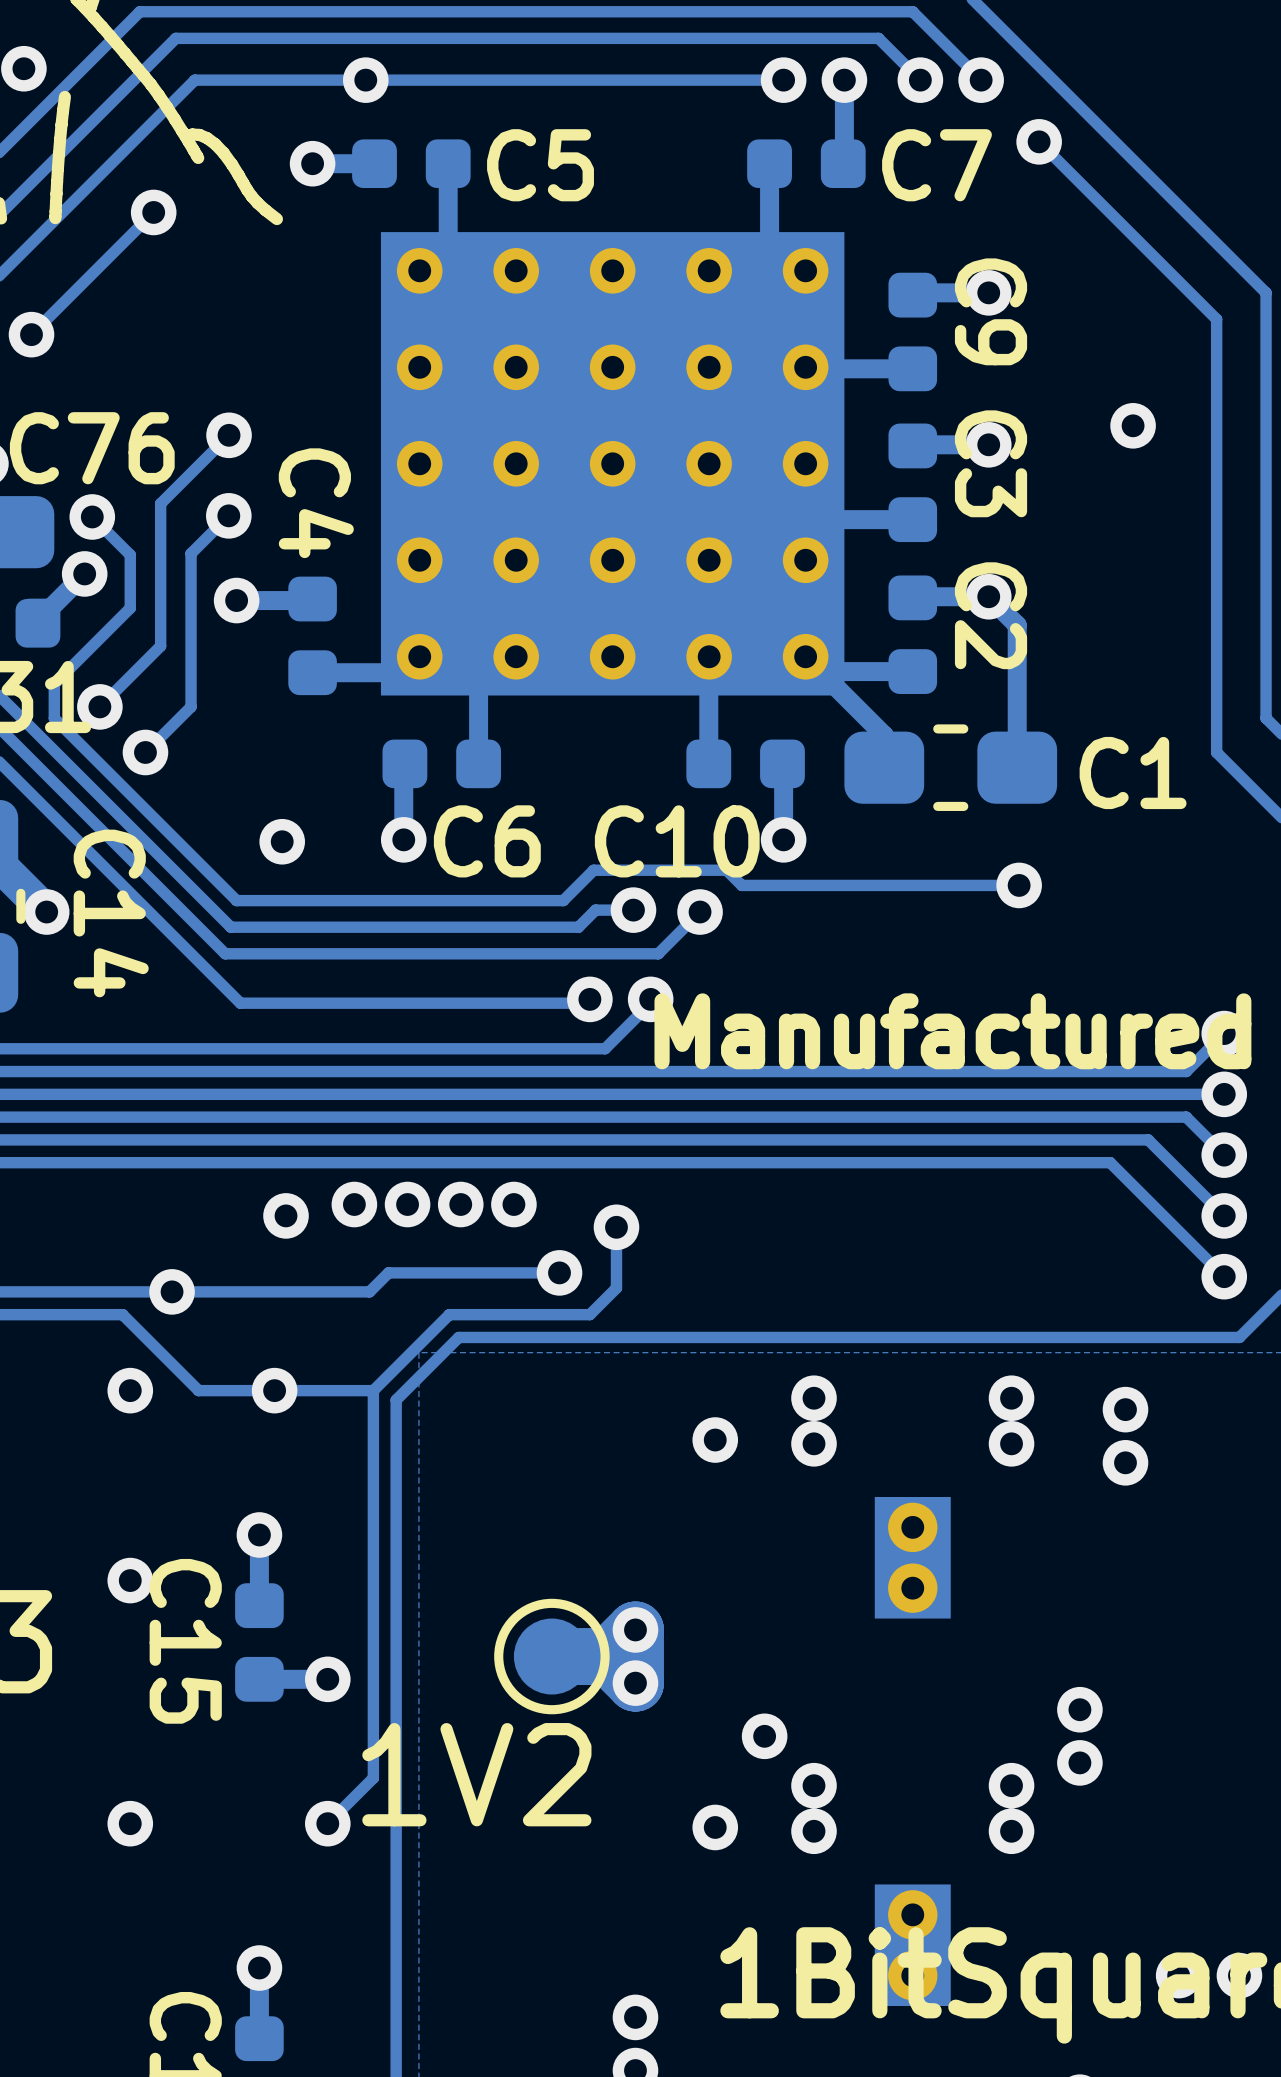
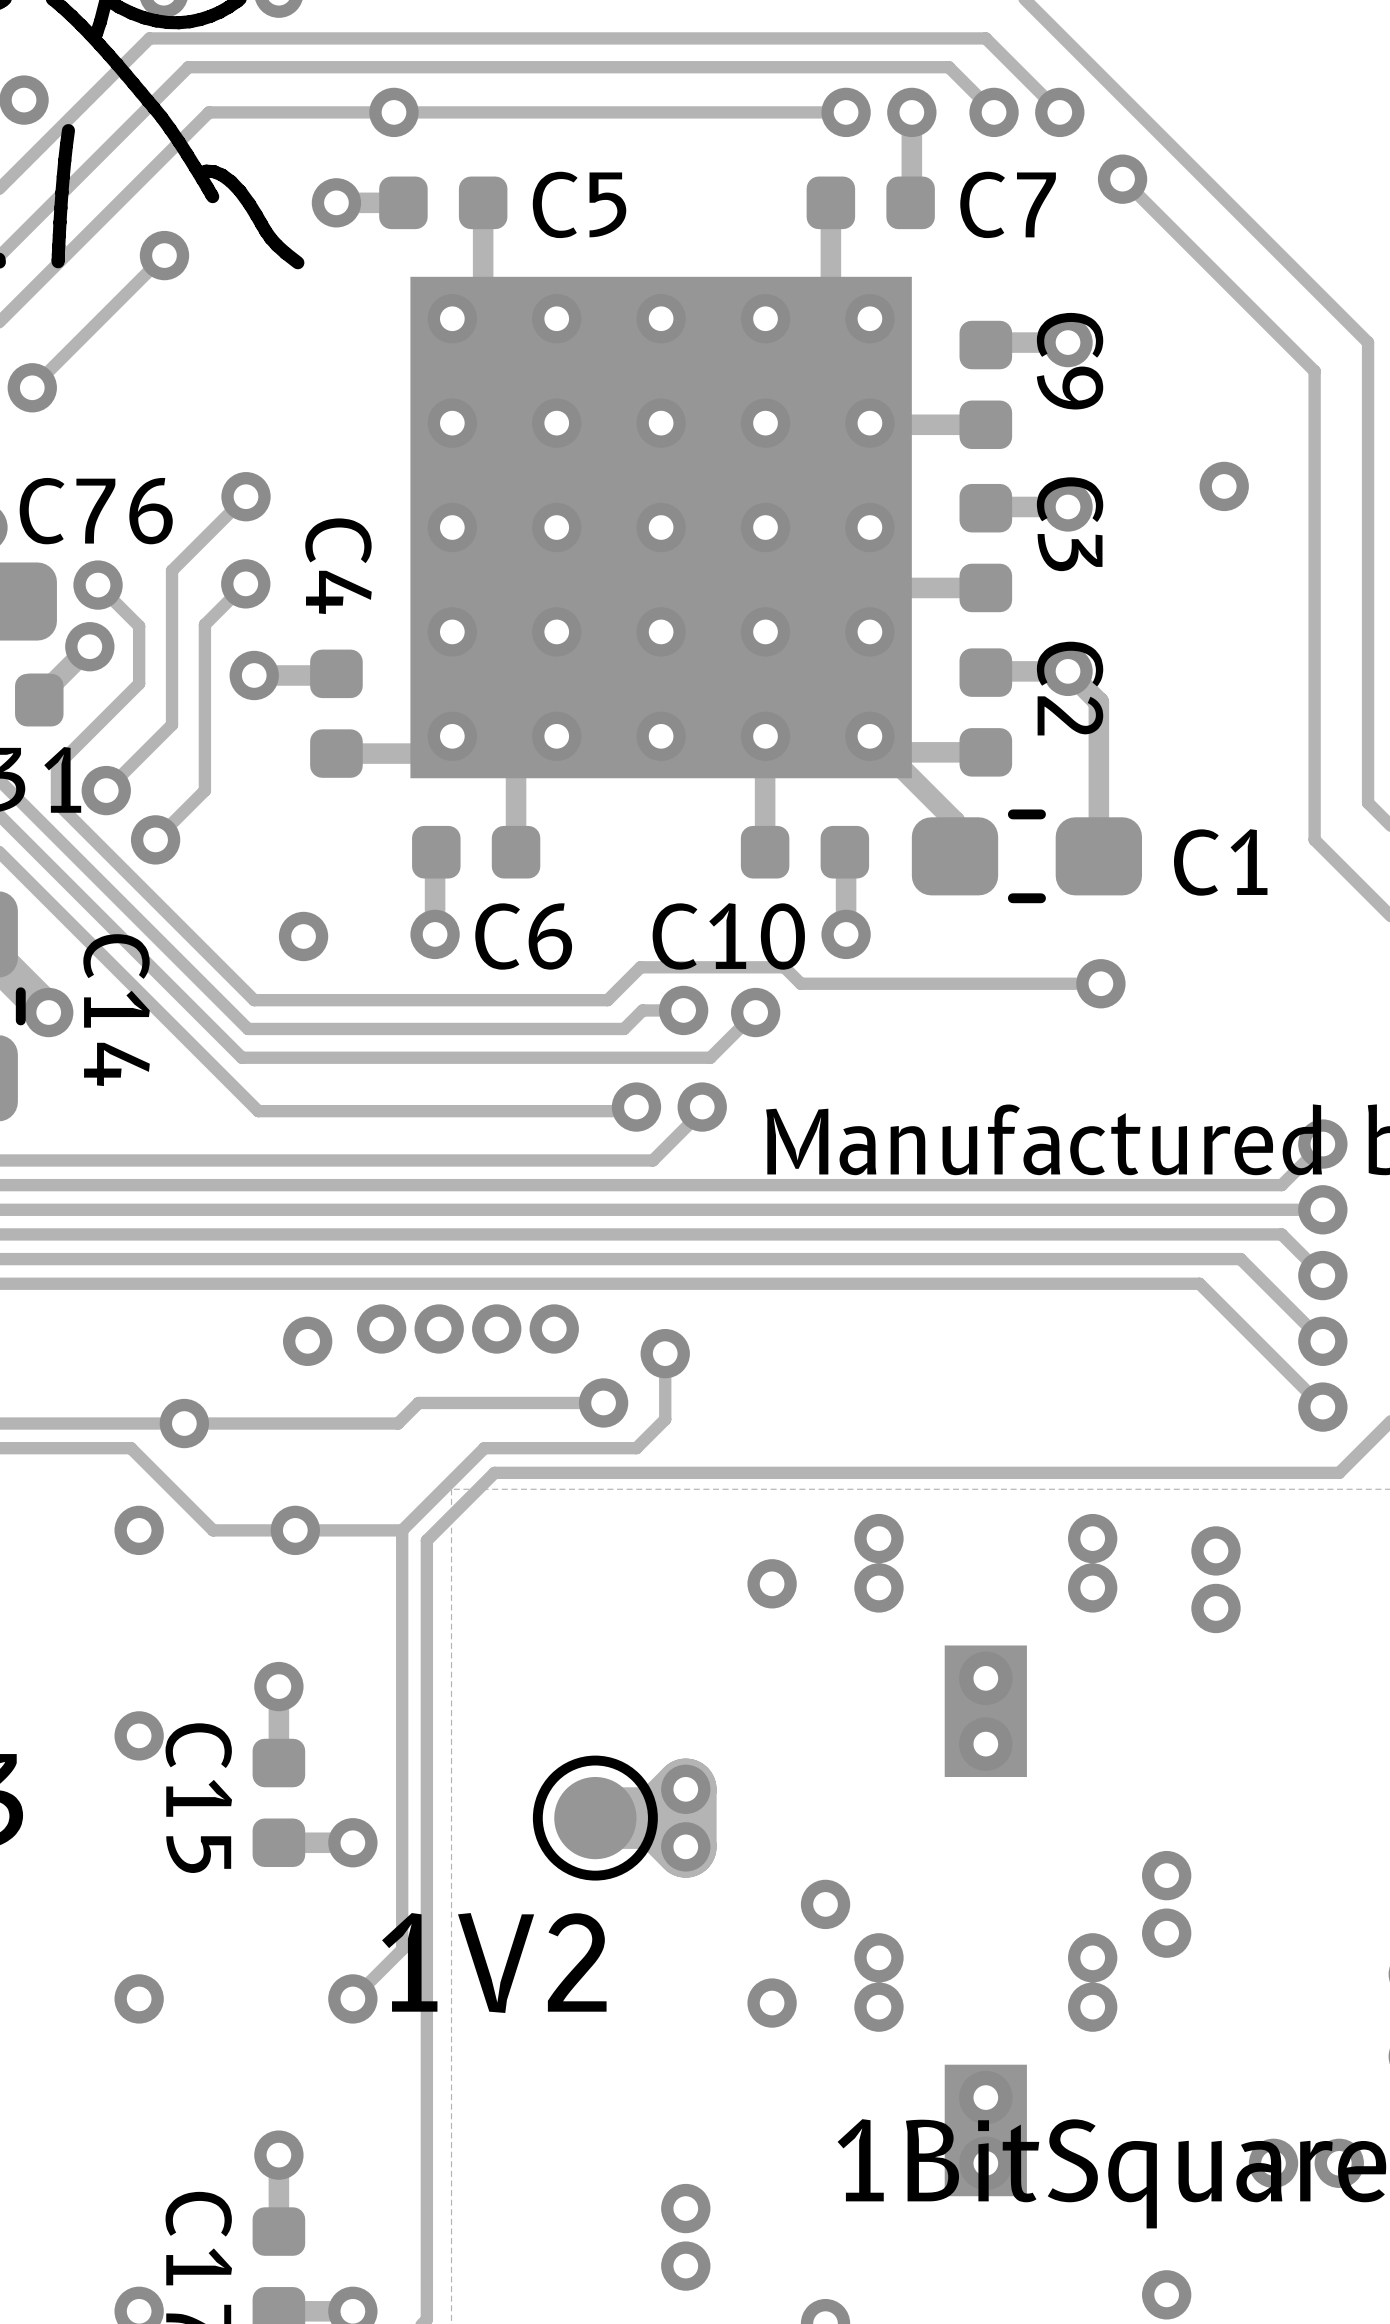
text position: 1V2 (476, 1774) -> 1V2 (494, 1963)

